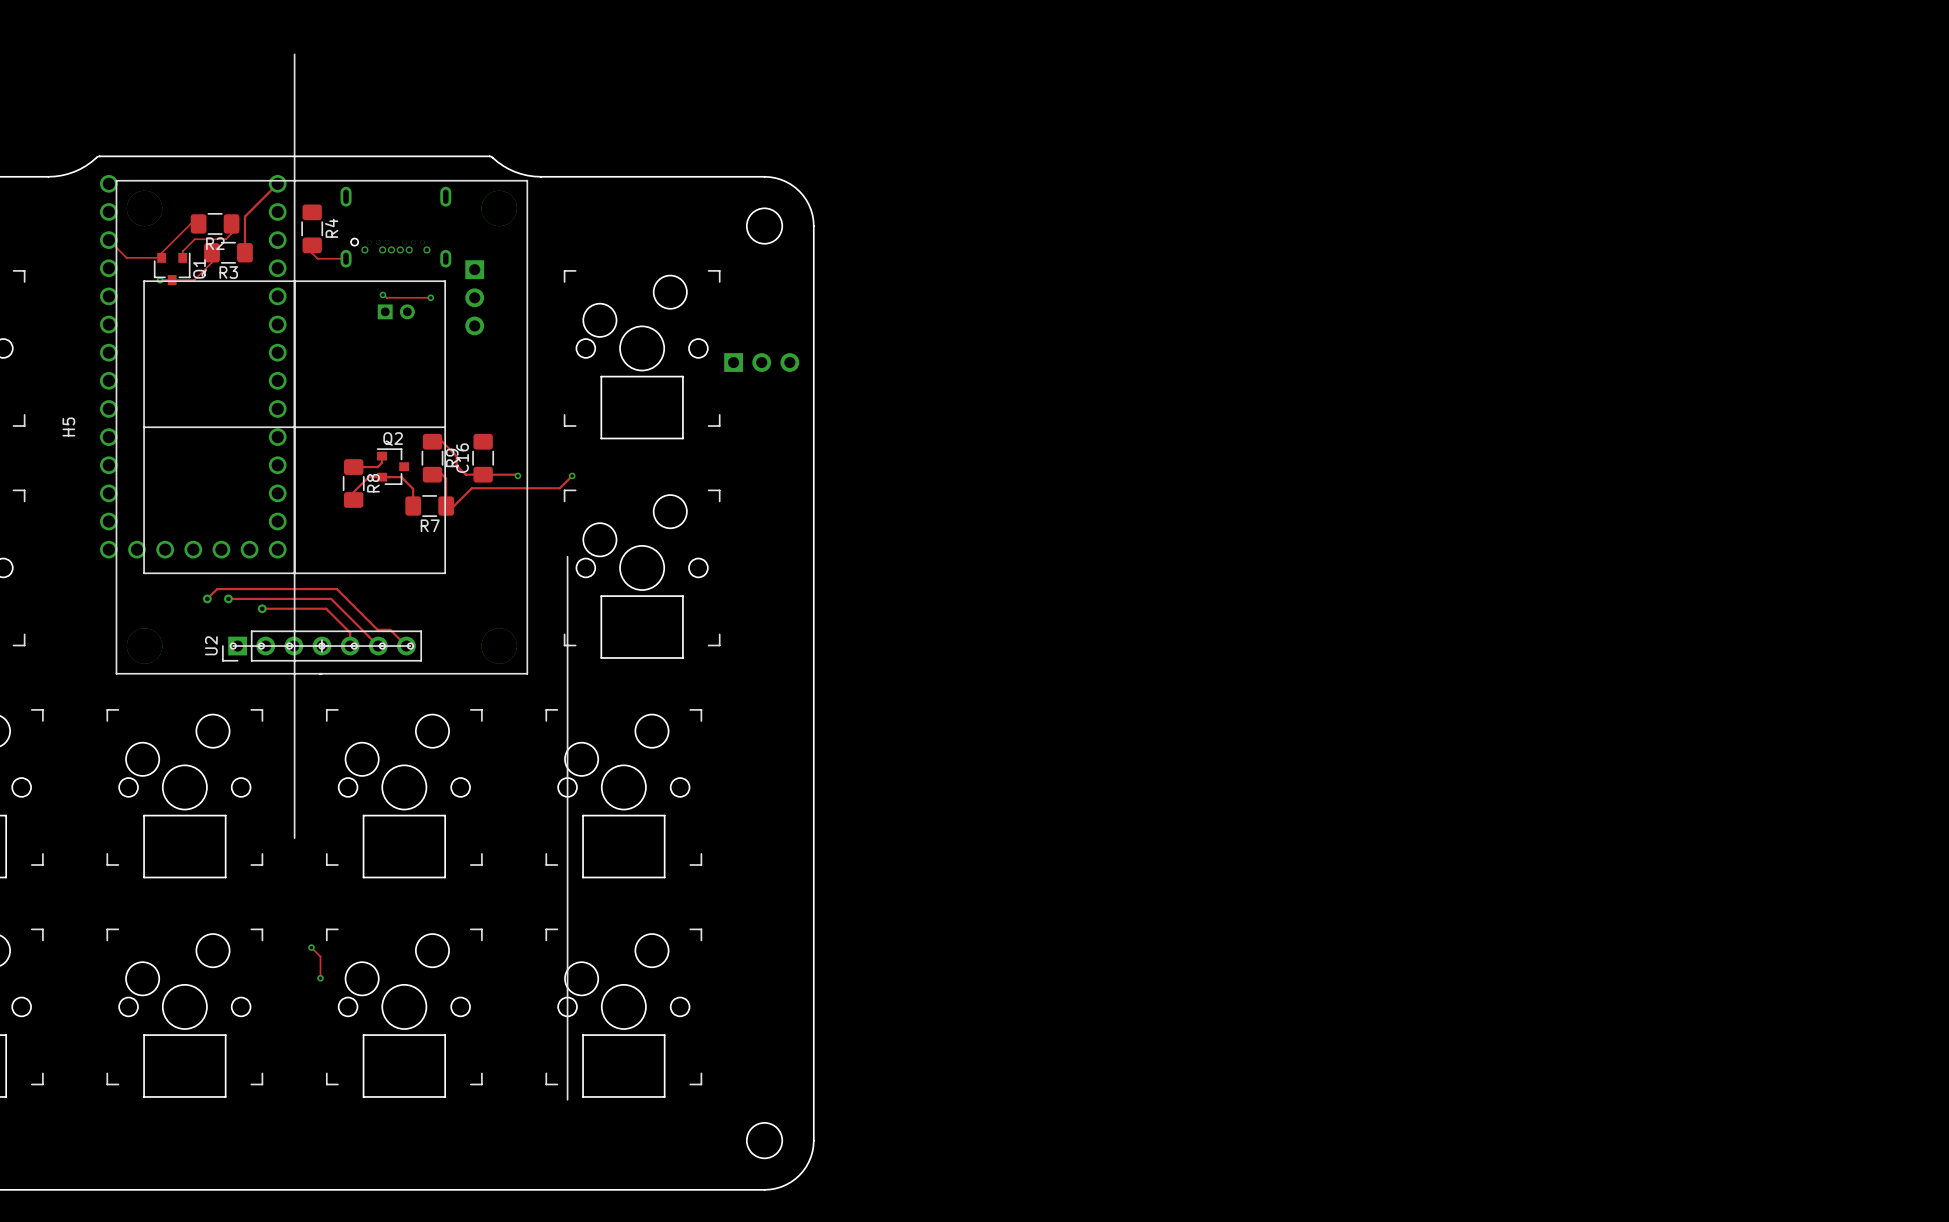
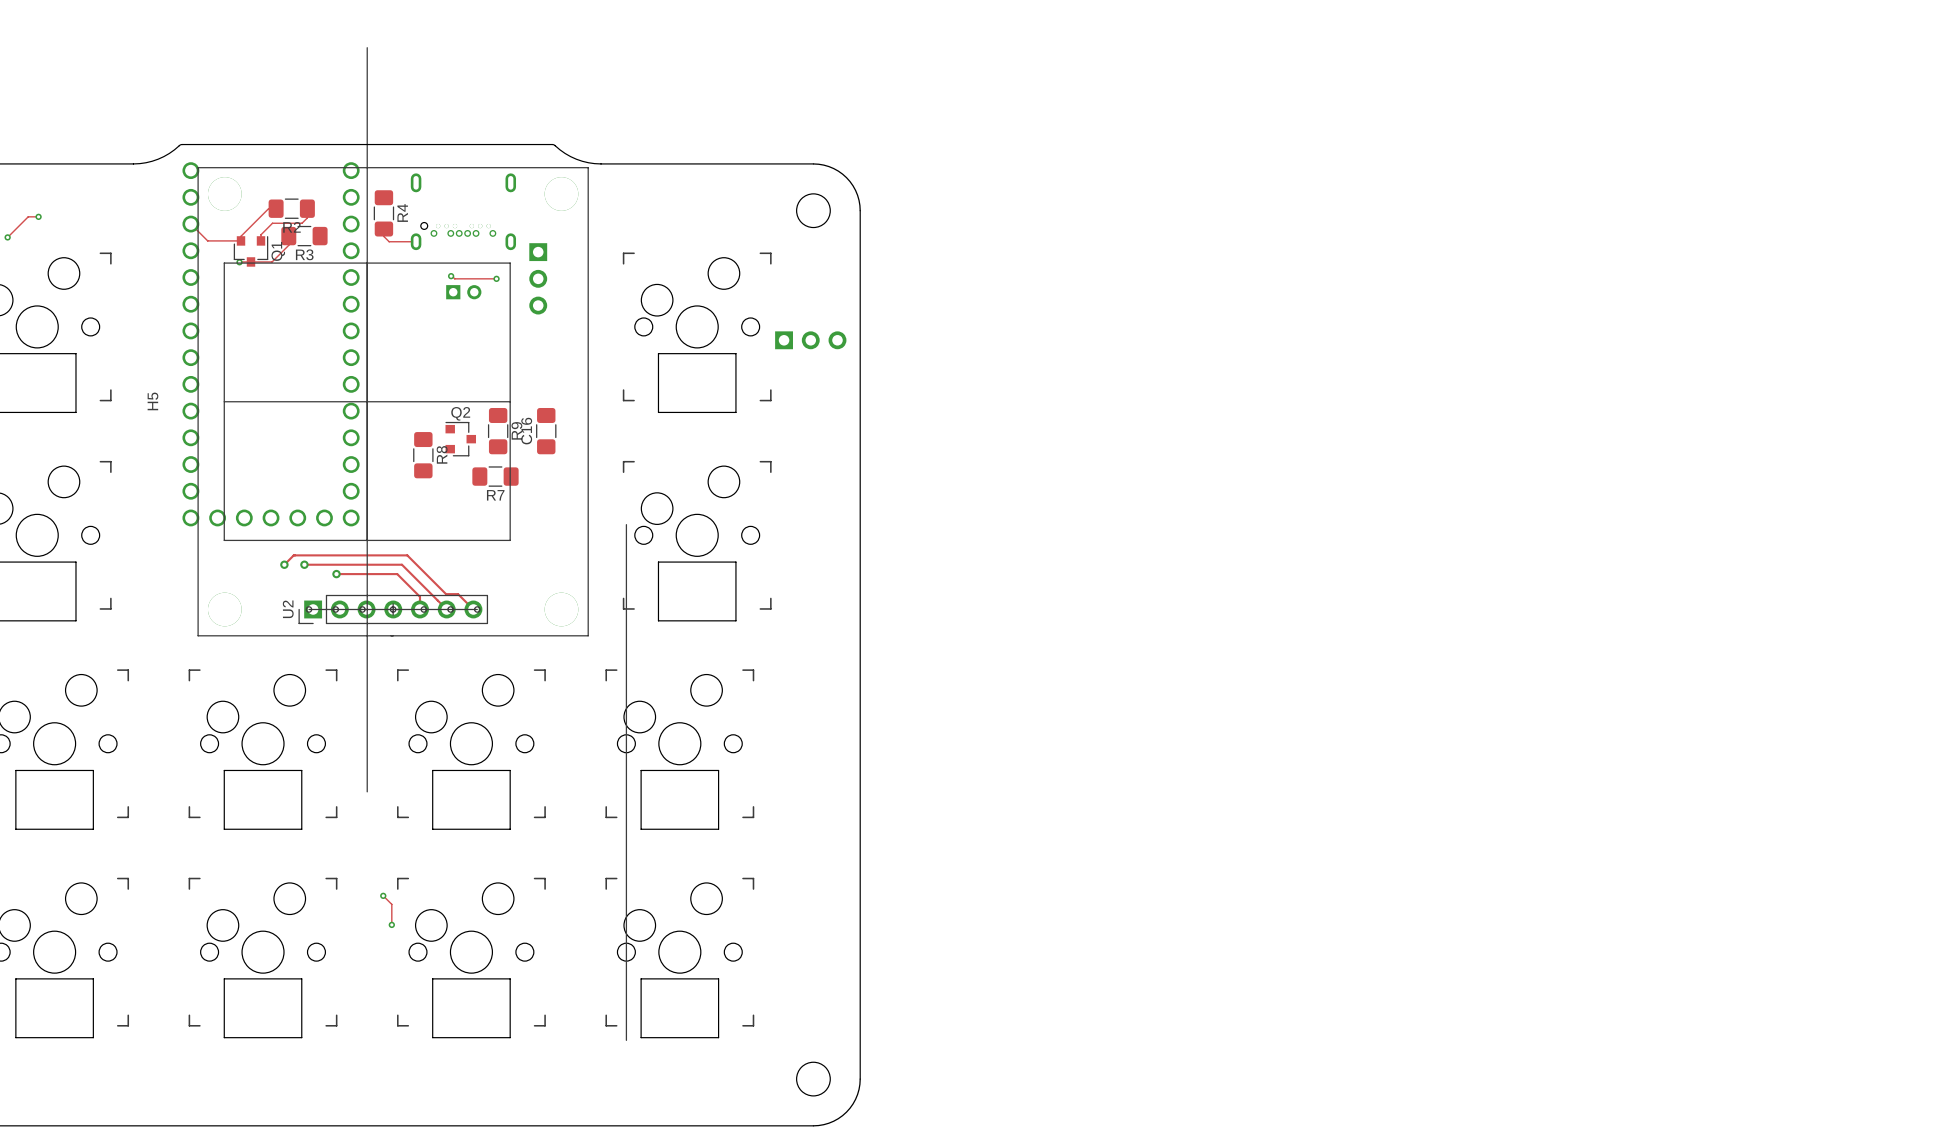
track: (277, 183) (244, 216) (244, 252) -> none
track: (432, 441) (442, 441) (456, 456) (456, 465) (465, 474) (517, 475) -> none
track: (382, 456) (382, 462) (377, 467) (353, 467) -> none
track: (432, 474) (442, 474) (446, 478) (446, 506) (454, 506) (471, 488) (559, 488) (572, 475) -> none
via: (517, 475) -> none
via: (572, 475) -> none
track: (353, 500) (353, 492) (368, 477) (401, 477) (413, 488) (413, 506) -> none

